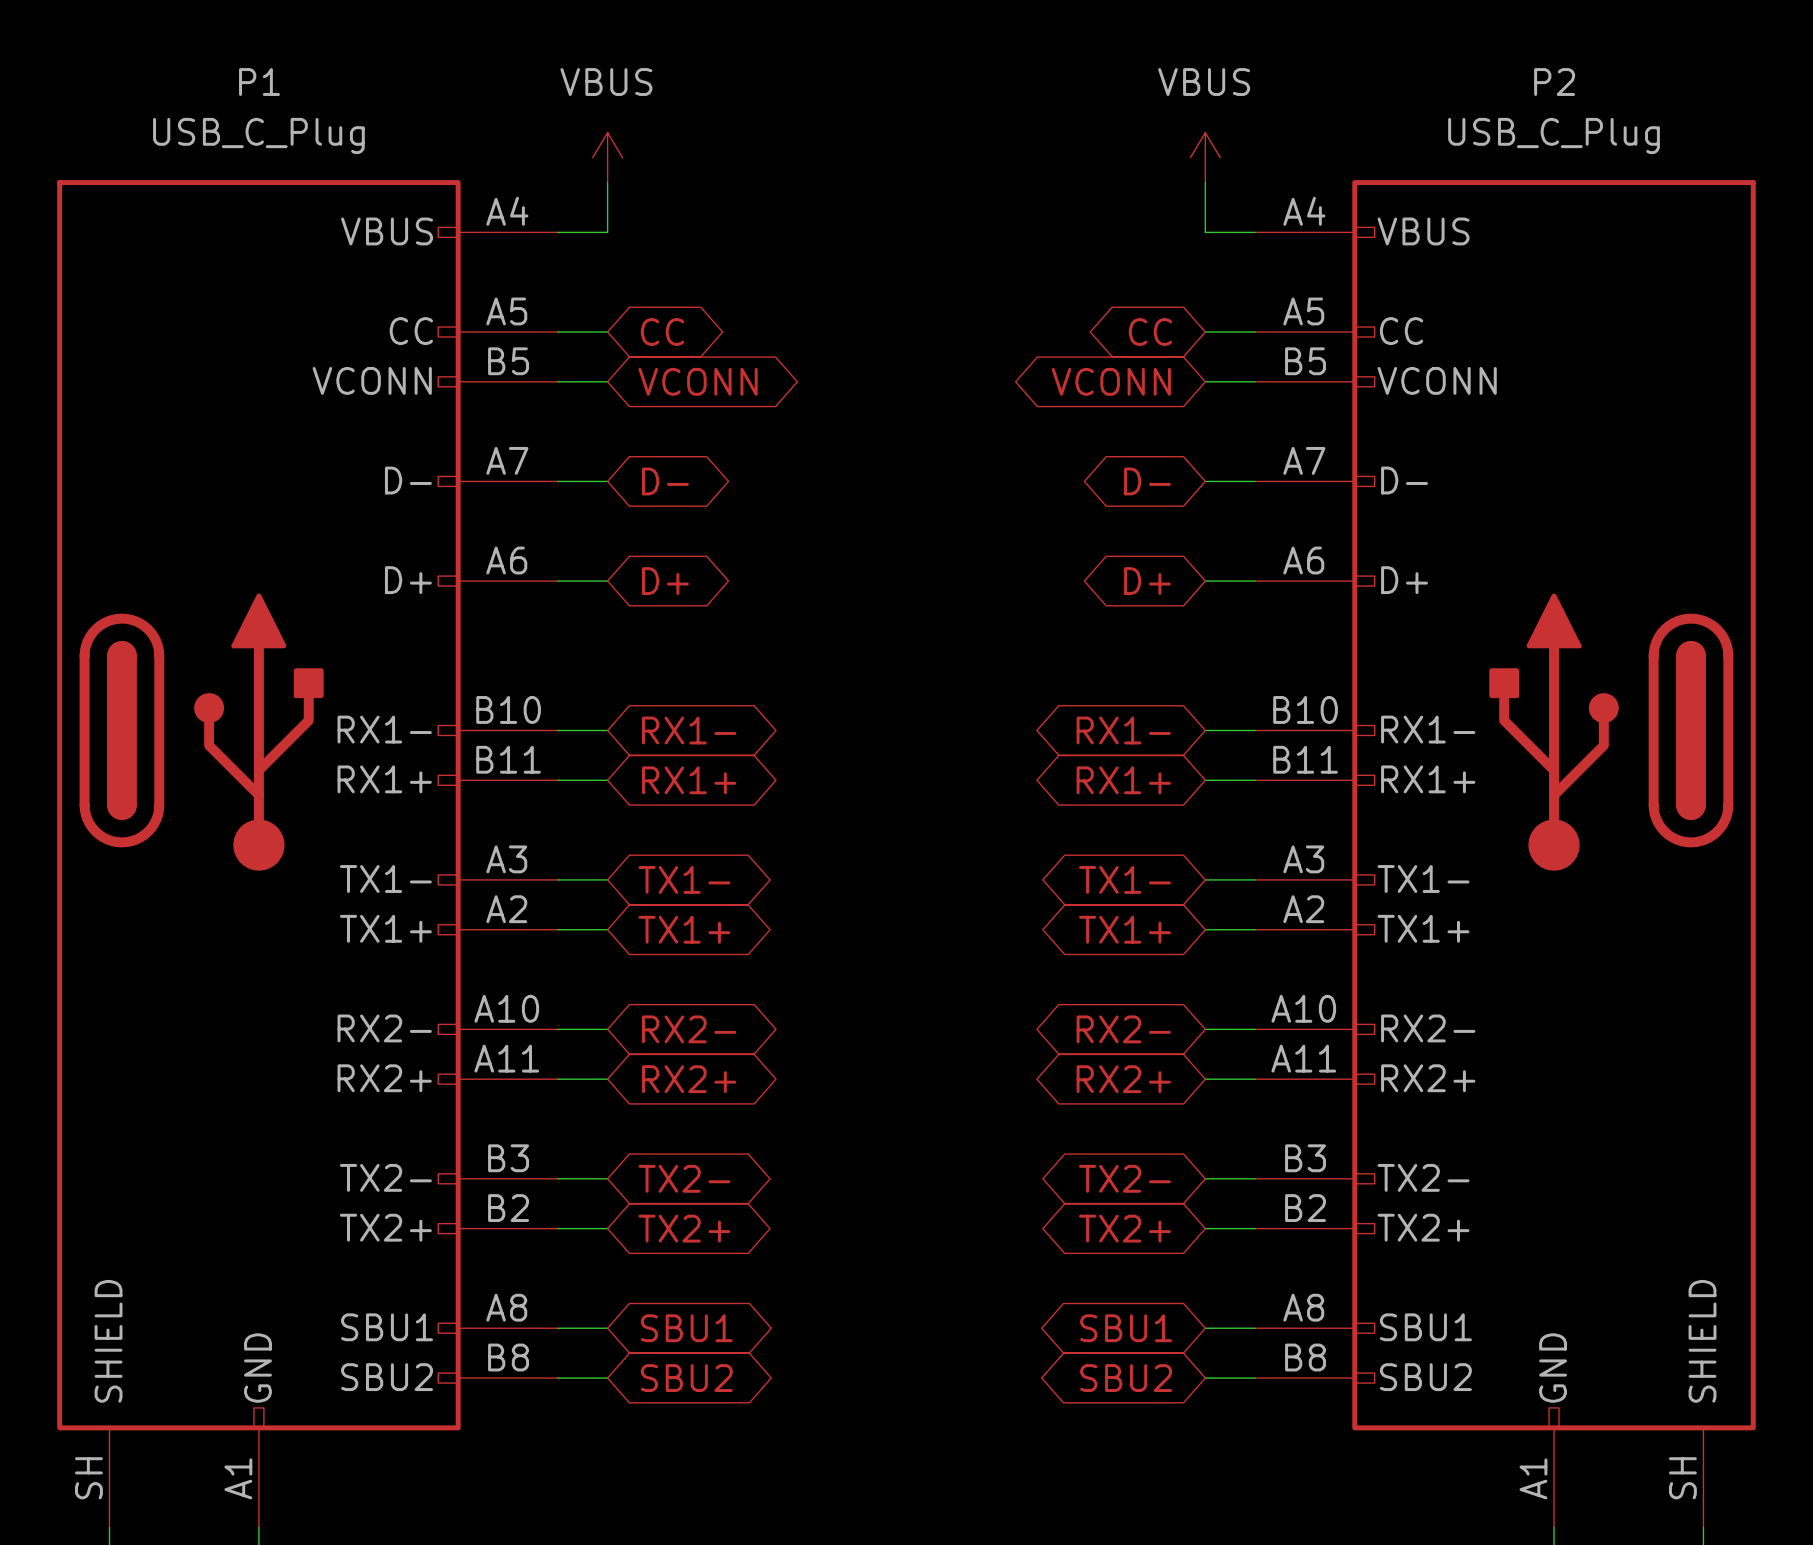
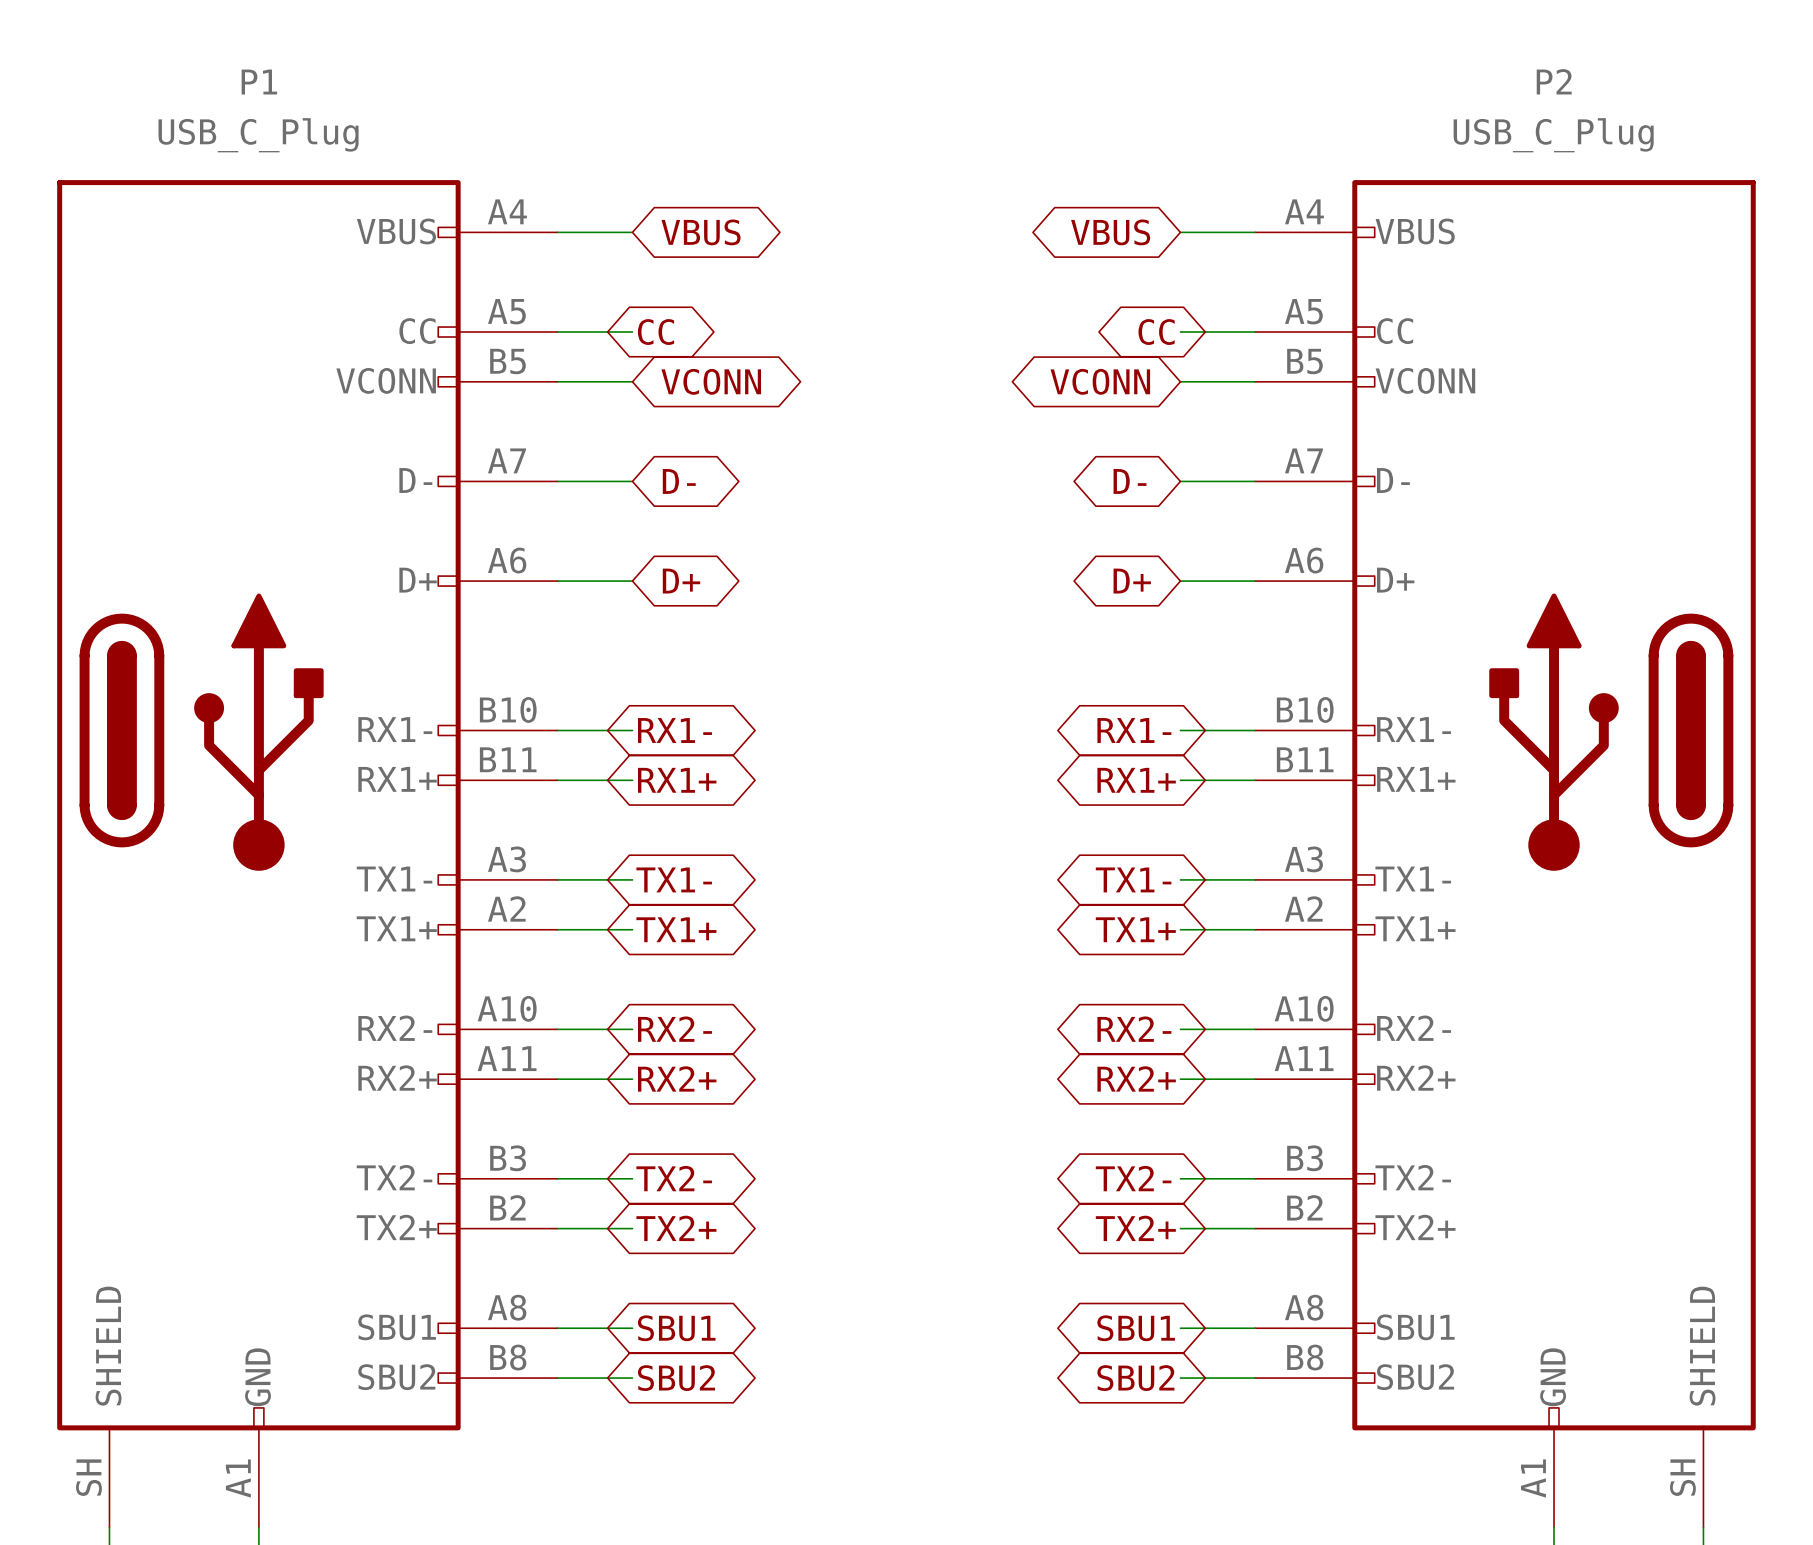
power symbol: VBUS (607, 157) -> none
power symbol: VBUS (1205, 157) -> none
wire: (607, 182) (607, 232) -> (632, 232) (607, 232)
wire: (1205, 182) (1205, 232) -> (1180, 232) (1205, 232)
global label: none -> VBUS (701, 232)
global label: none -> VBUS (1110, 232)
wire: none -> (607, 332) (632, 332)
wire: none -> (1180, 332) (1205, 332)
wire: none -> (607, 381) (632, 381)
global label position: VCONN (698, 381) -> VCONN (711, 381)
global label position: VCONN (1111, 381) -> VCONN (1100, 381)
wire: none -> (1180, 381) (1205, 381)
wire: none -> (607, 481) (632, 481)
global label position: D- (665, 481) -> D- (679, 481)
global label position: D- (1147, 481) -> D- (1130, 481)
wire: none -> (1180, 481) (1205, 481)
wire: none -> (607, 581) (632, 581)
global label position: D+ (665, 581) -> D+ (681, 581)
global label position: D+ (1147, 581) -> D+ (1132, 581)
wire: none -> (1180, 581) (1205, 581)
wire: none -> (607, 730) (632, 730)
wire: none -> (1180, 730) (1205, 730)
wire: none -> (607, 780) (632, 780)
wire: none -> (1180, 780) (1205, 780)
wire: none -> (607, 879) (632, 879)
wire: none -> (1180, 879) (1205, 879)
wire: none -> (607, 929) (632, 929)
wire: none -> (1180, 929) (1205, 929)
wire: none -> (607, 1029) (632, 1029)
wire: none -> (1180, 1029) (1205, 1029)
wire: none -> (607, 1079) (632, 1079)
wire: none -> (1180, 1079) (1205, 1079)
wire: none -> (607, 1178) (632, 1178)
wire: none -> (1180, 1178) (1205, 1178)
wire: none -> (607, 1228) (632, 1228)
wire: none -> (1180, 1228) (1205, 1228)
wire: none -> (607, 1328) (632, 1328)
wire: none -> (1180, 1328) (1205, 1328)
wire: none -> (607, 1378) (632, 1378)
wire: none -> (1180, 1378) (1205, 1378)

